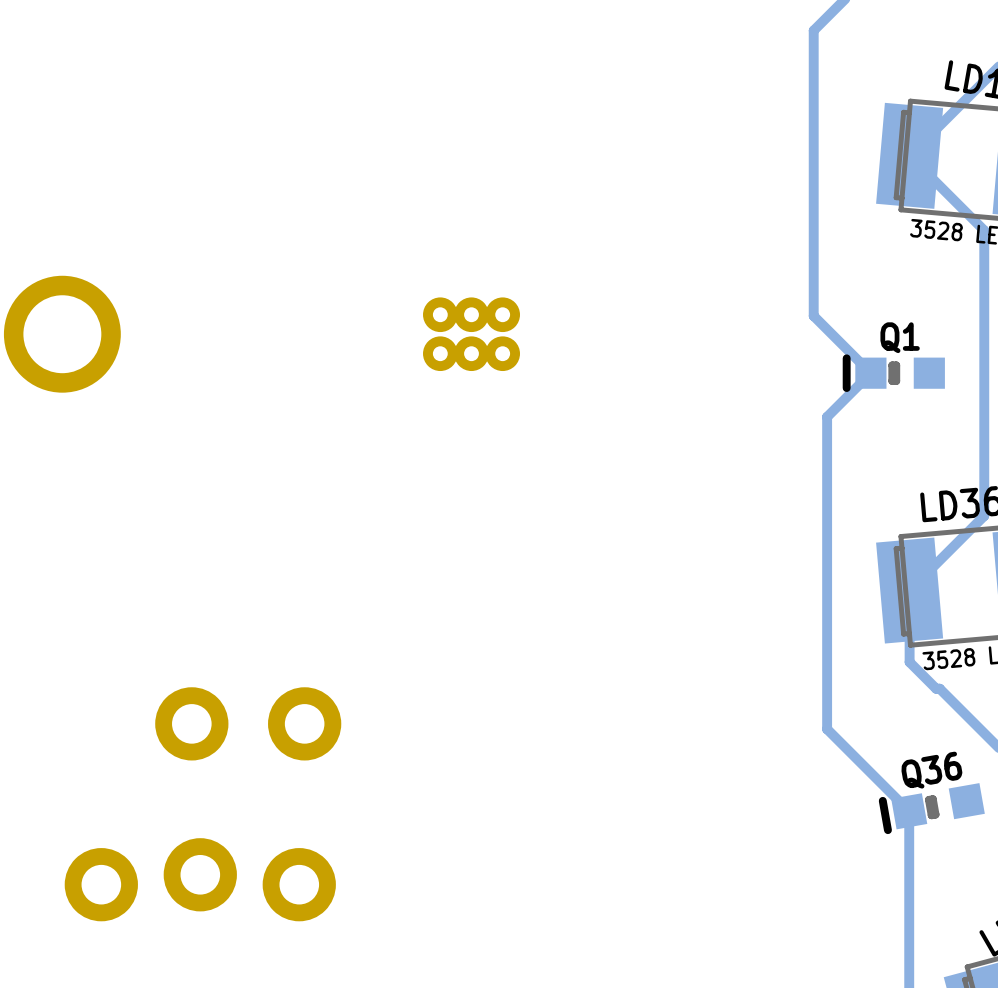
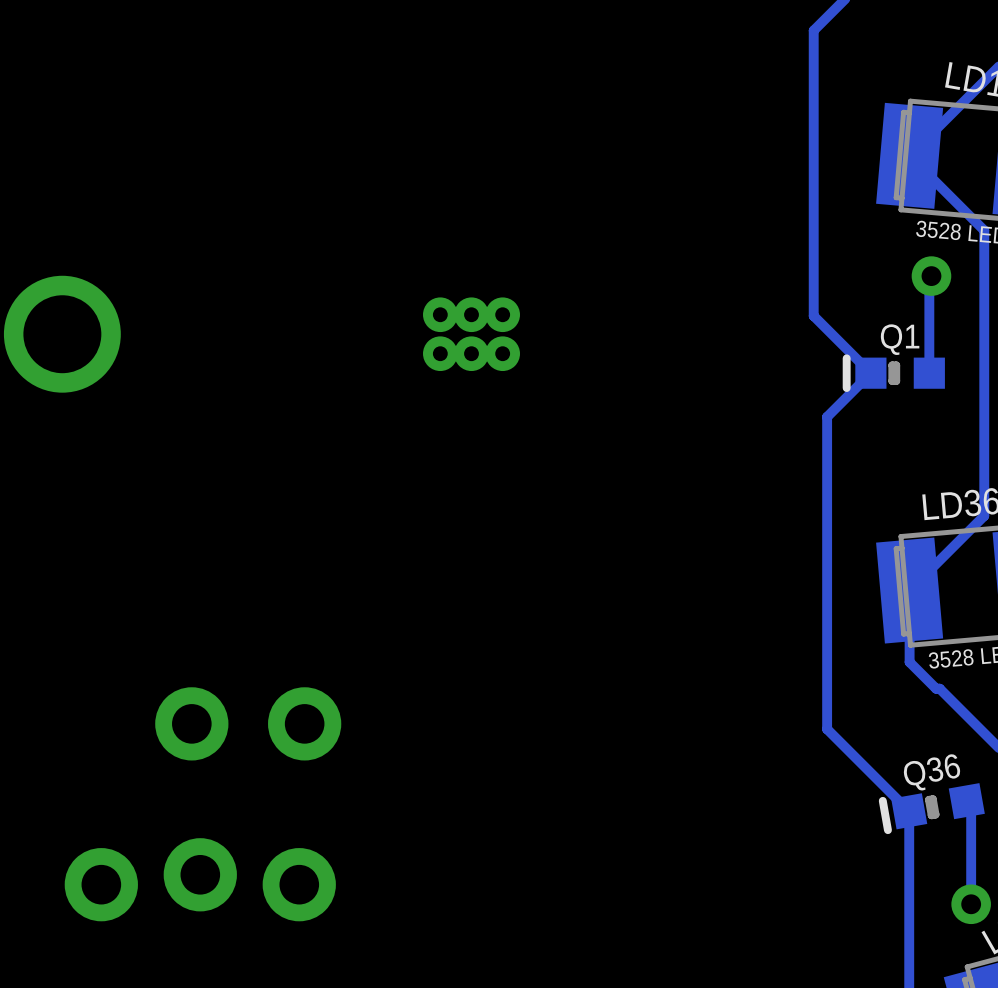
track: none -> (931, 276) (929, 278) (929, 373)
via: none -> (931, 276)
track: none -> (966, 801) (971, 805) (971, 904)
via: none -> (971, 904)

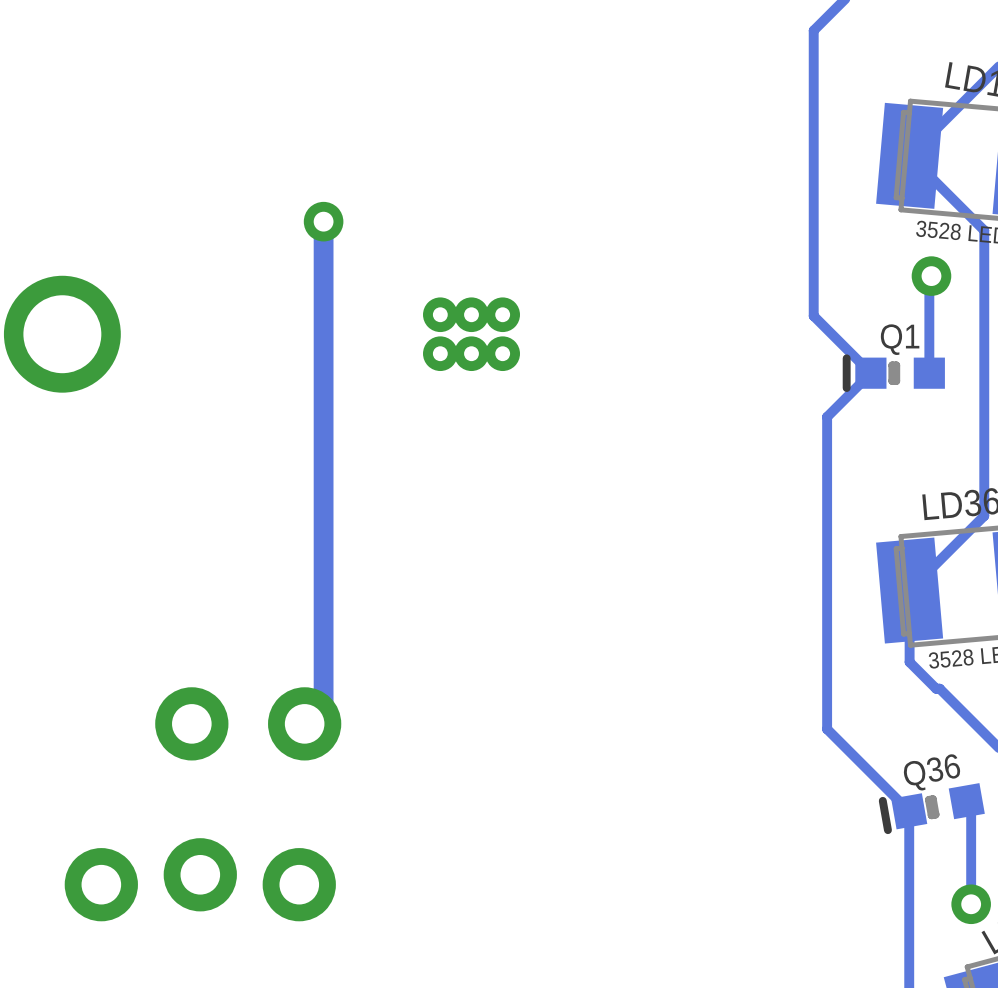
track: none -> (323, 221) (323, 704) (304, 723)
via: none -> (323, 221)

